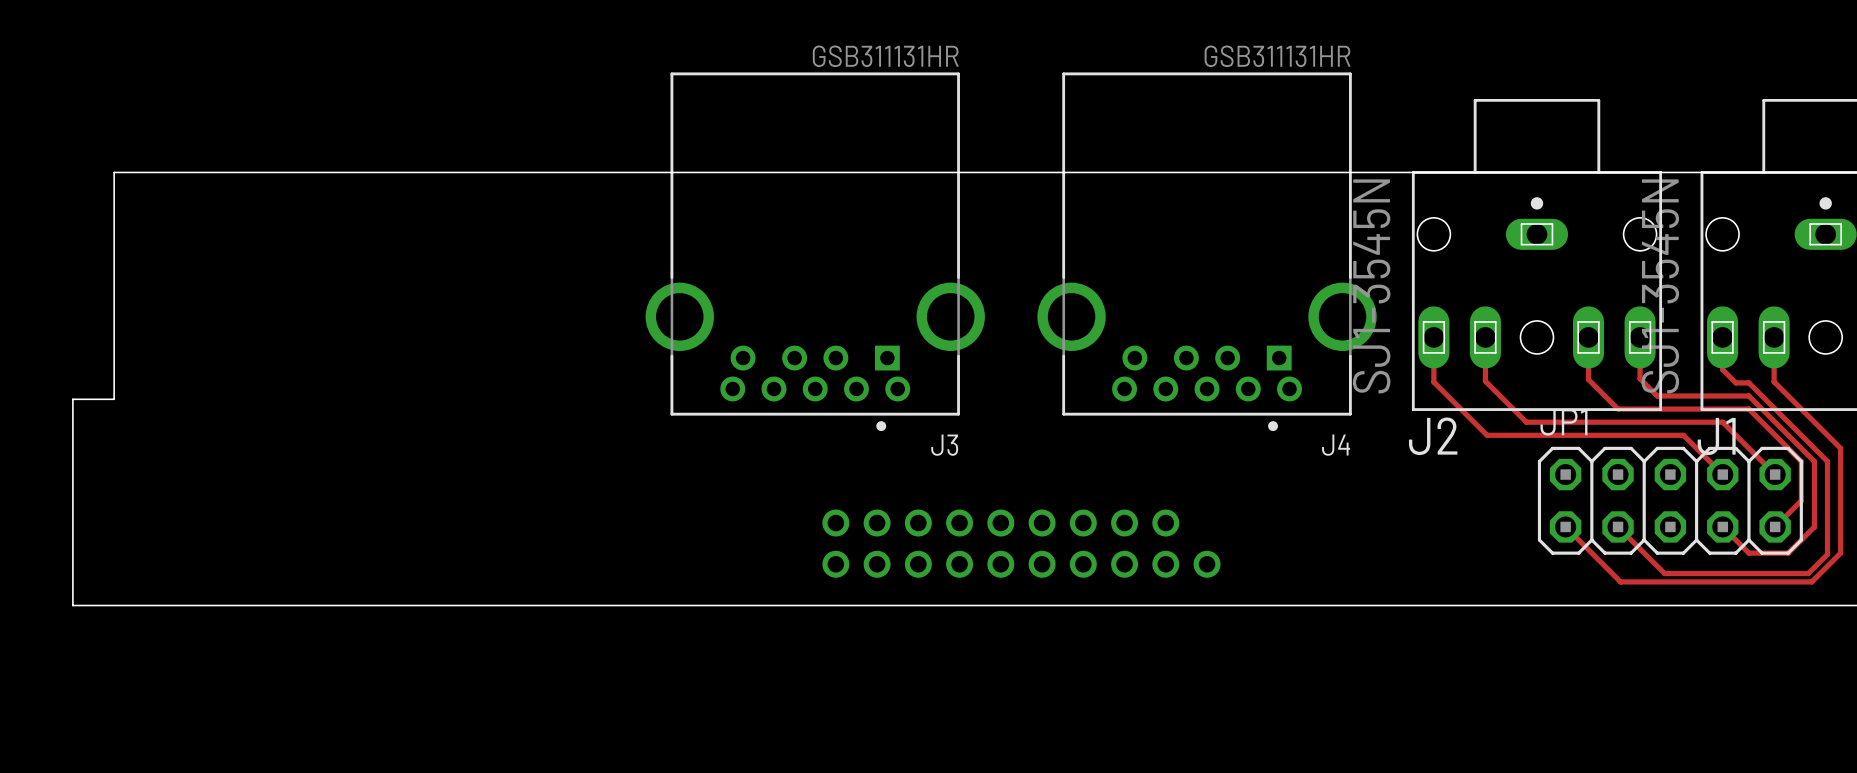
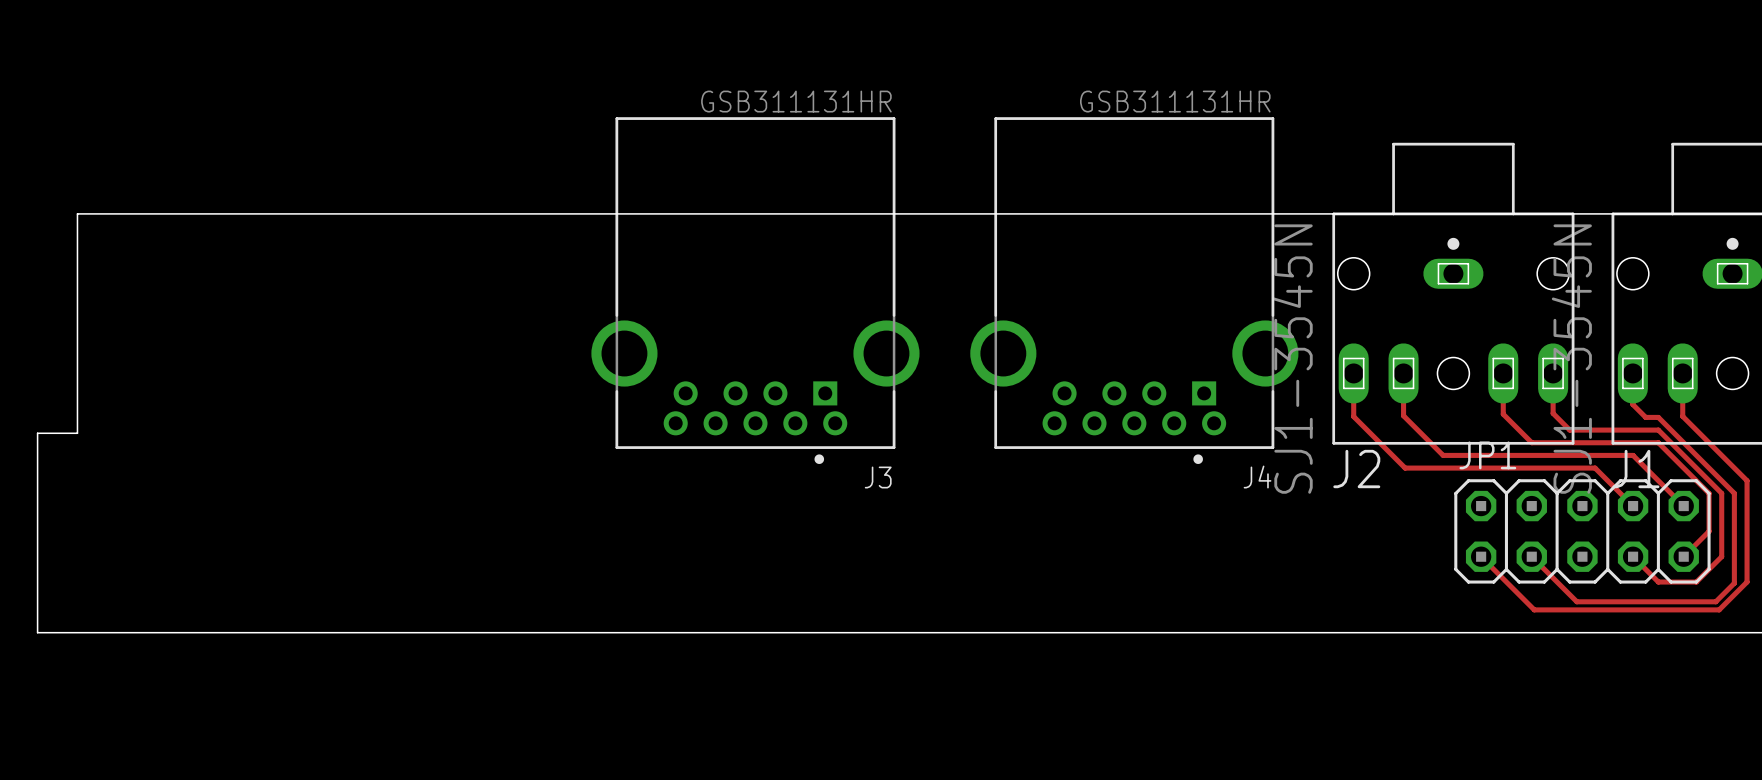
part: (1021, 543) -> none

